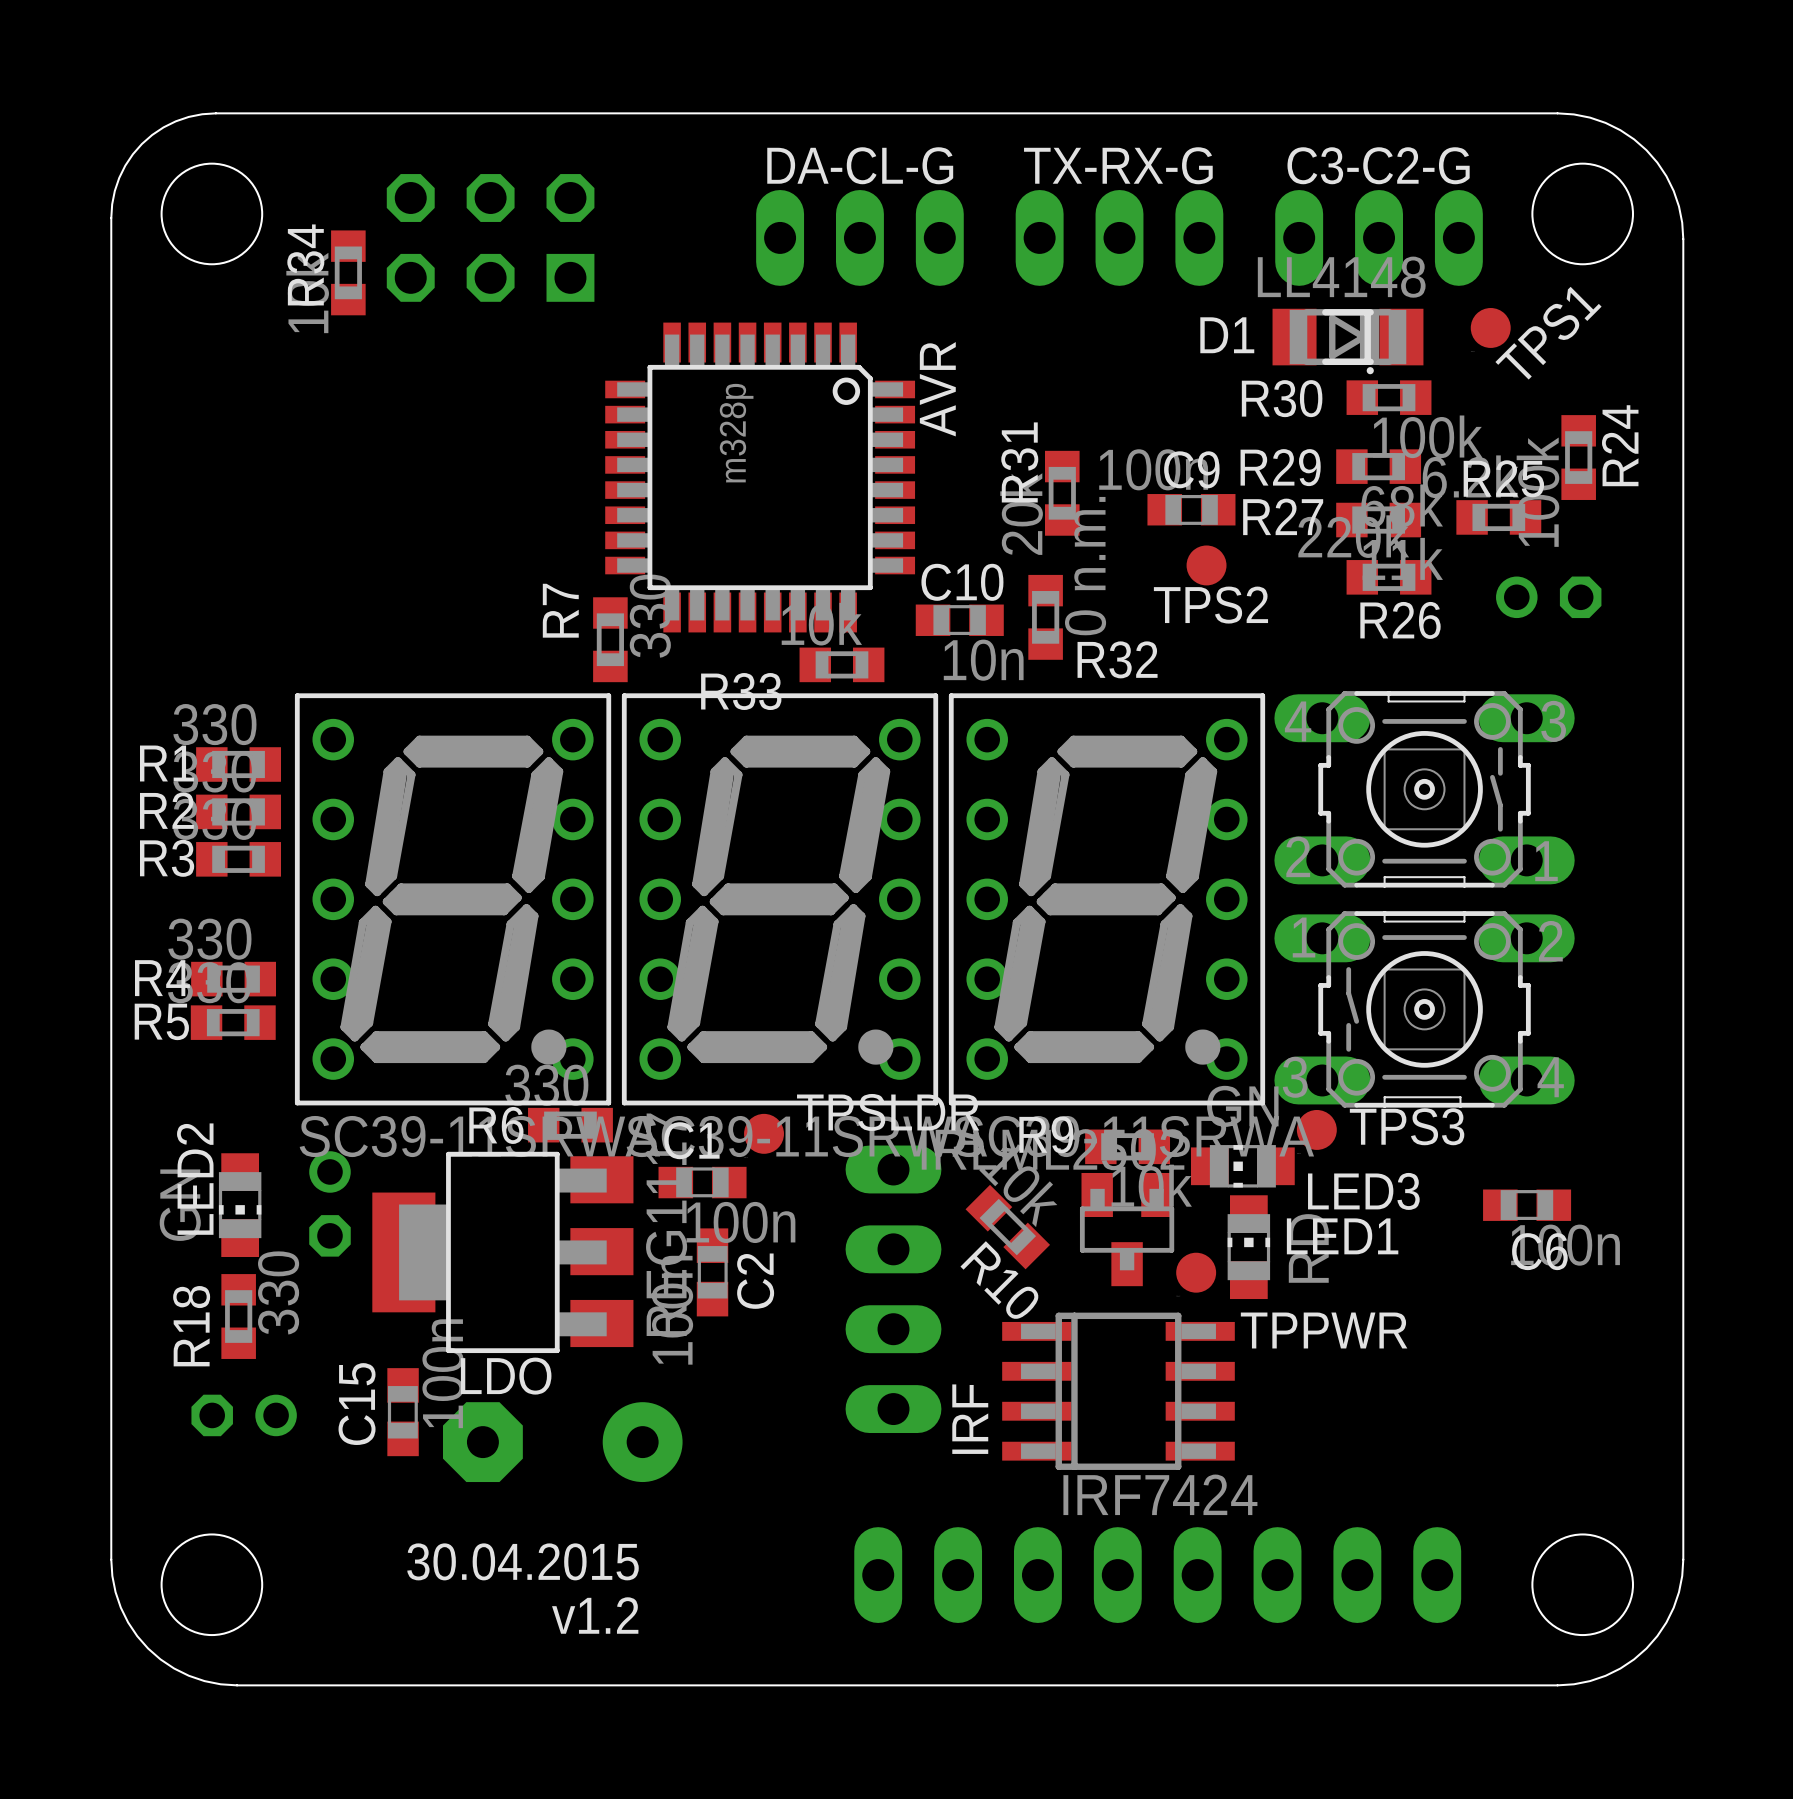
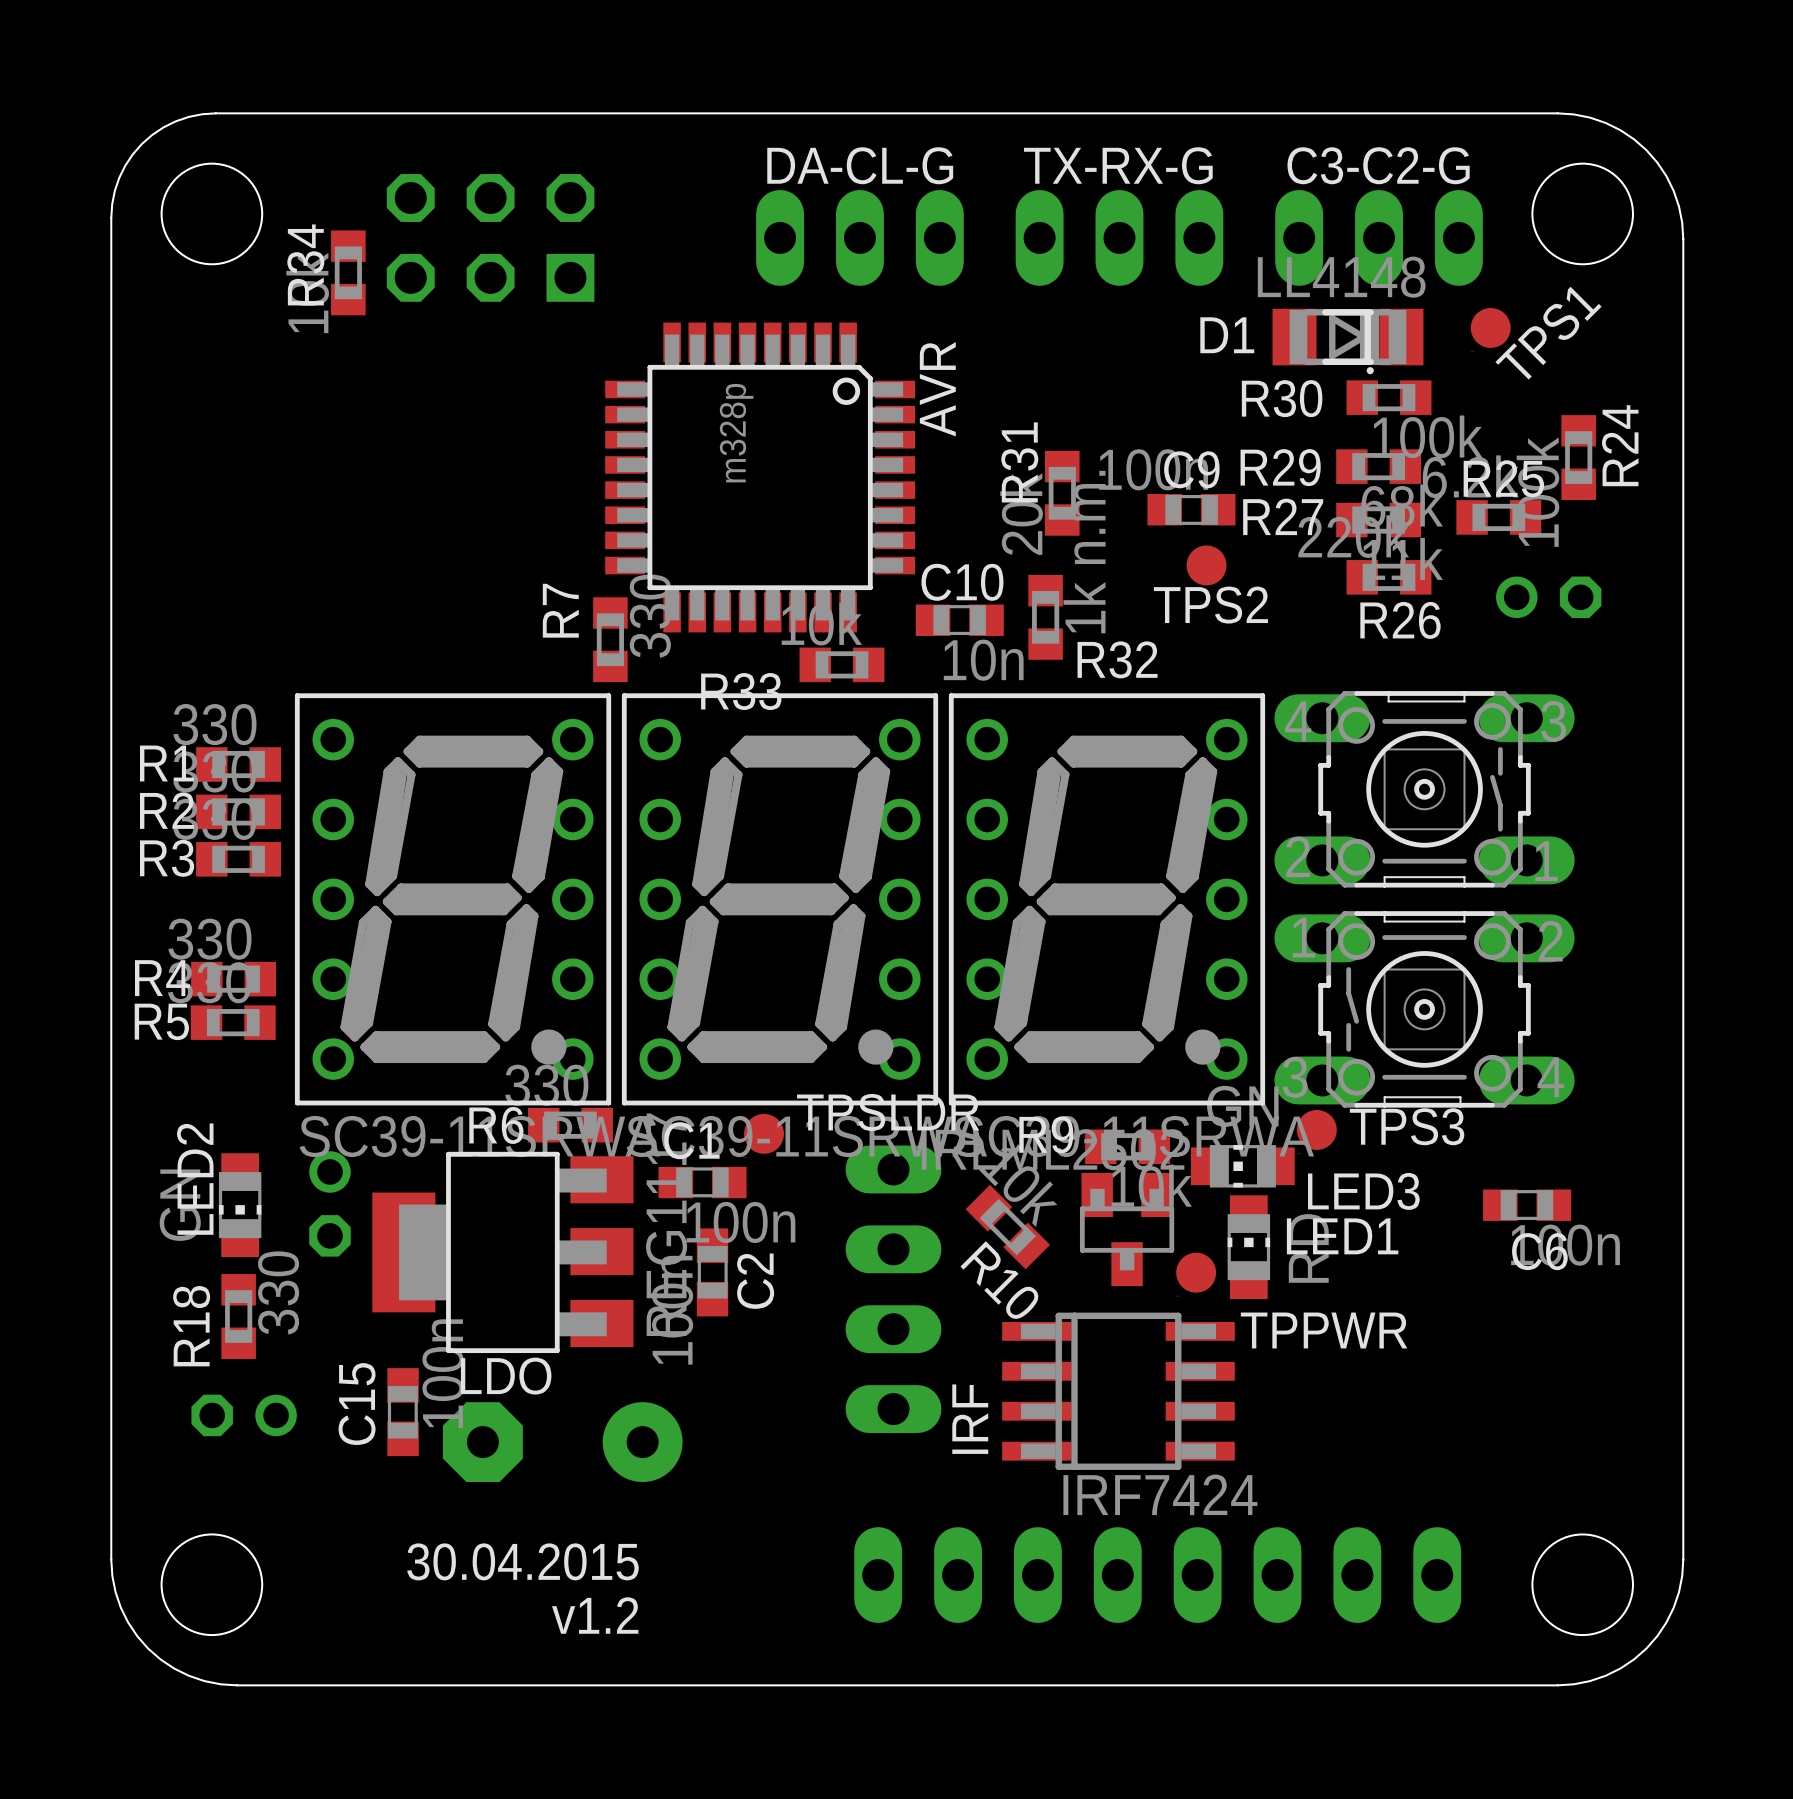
R32 value: 0 n.m. (1085, 566) -> 1k n.m. (1084, 552)

